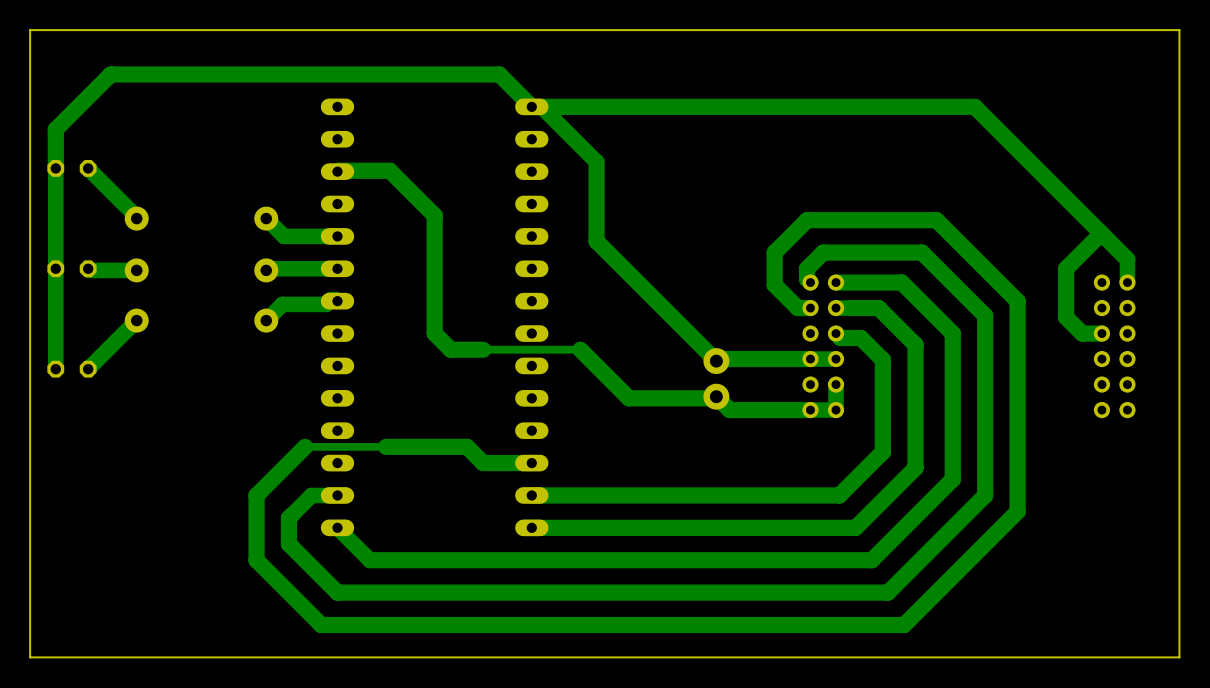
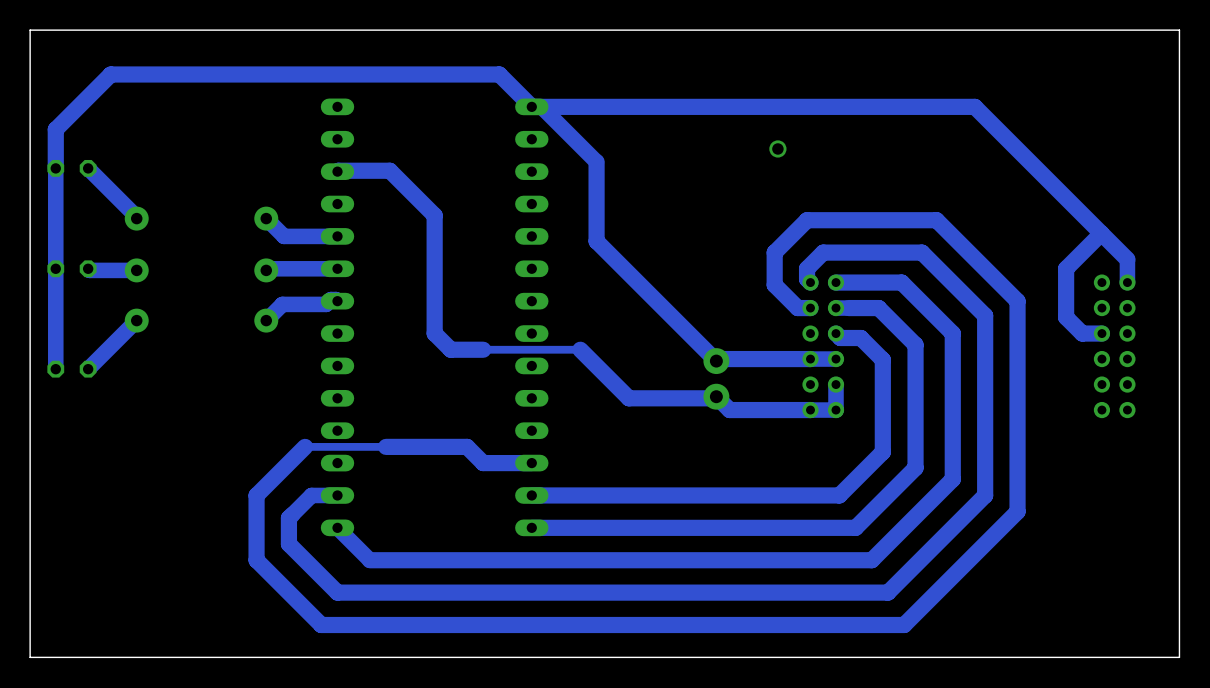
via: none -> (777, 148)

